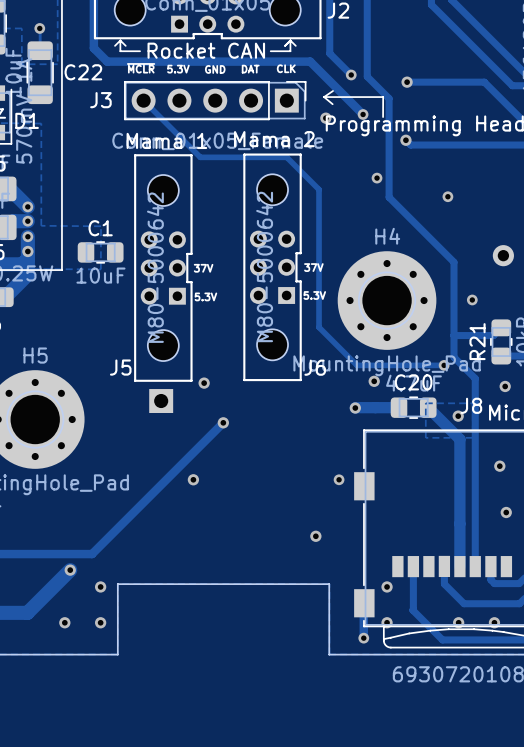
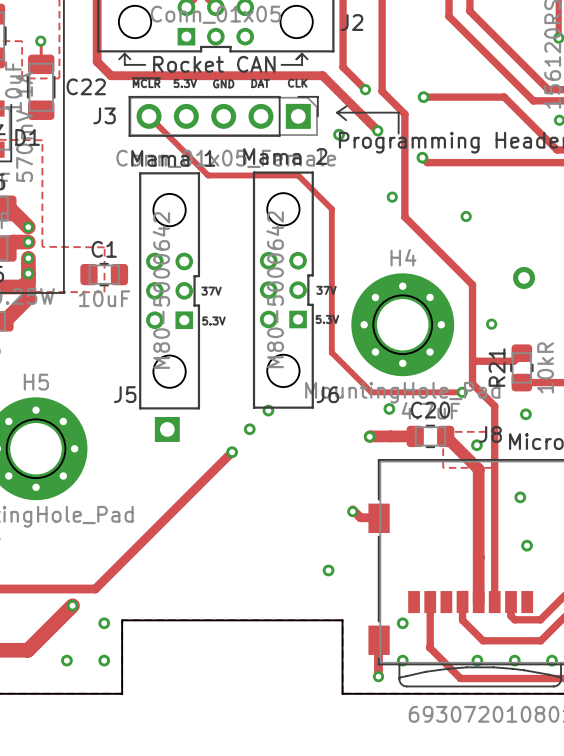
via: none -> (268, 410)
via: (204, 383) -> none
via: none -> (249, 429)
track: none -> (352, 509) (360, 517) (378, 517)
via: (193, 479) -> none

